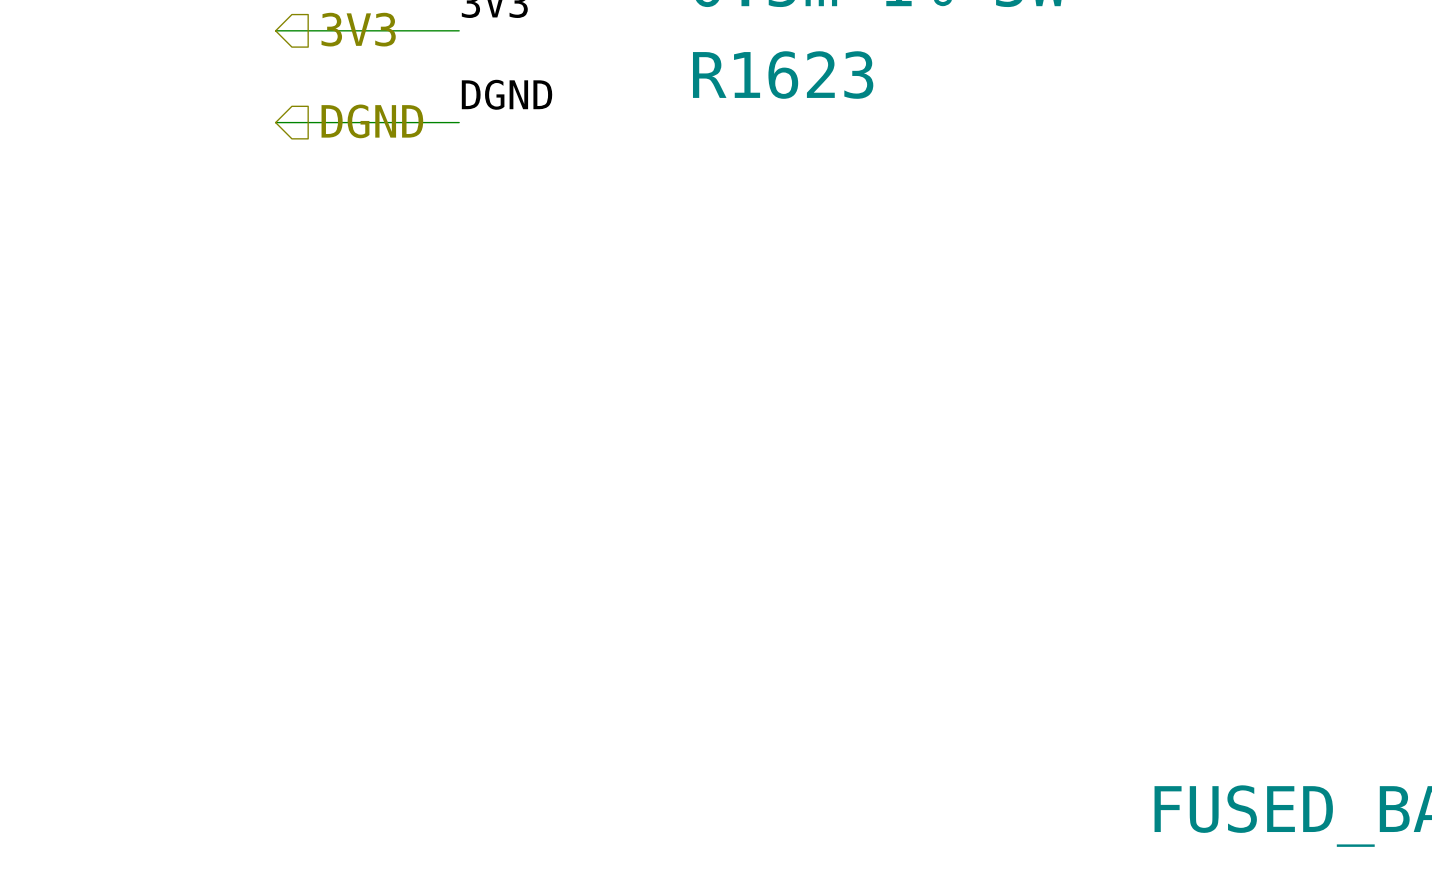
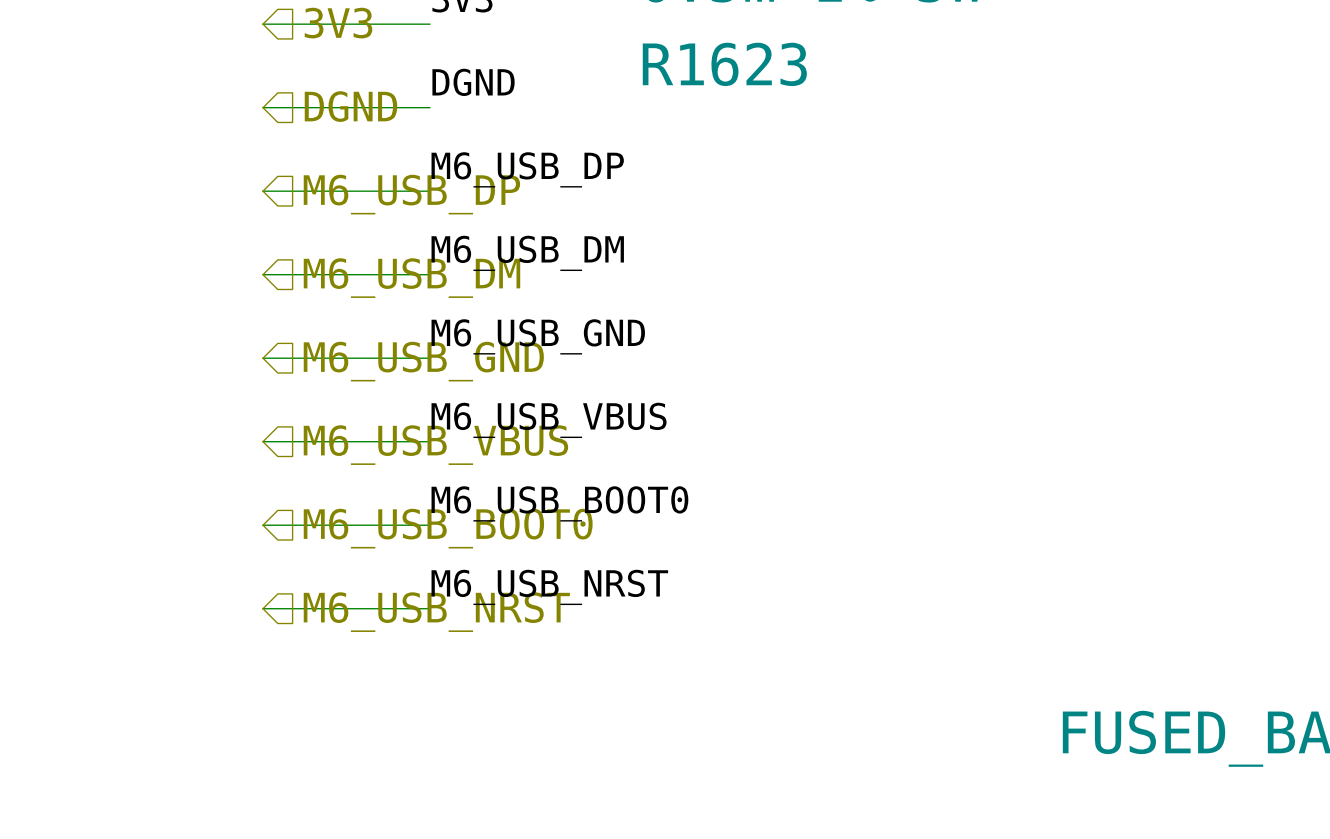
label: none -> M6_USB_DP (527, 169)
wire: none -> (263, 191) (430, 191)
hierarchical label: none -> M6_USB_DP (411, 194)
label: none -> M6_USB_DM (527, 253)
wire: none -> (263, 274) (430, 274)
hierarchical label: none -> M6_USB_DM (411, 278)
label: none -> M6_USB_GND (538, 336)
wire: none -> (263, 358) (430, 358)
hierarchical label: none -> M6_USB_GND (423, 361)
label: none -> M6_USB_VBUS (549, 420)
wire: none -> (263, 441) (430, 441)
hierarchical label: none -> M6_USB_VBUS (435, 445)
label: none -> M6_USB_BOOT0 (559, 503)
wire: none -> (263, 525) (430, 525)
hierarchical label: none -> M6_USB_BOOT0 (448, 528)
label: none -> M6_USB_NRST (549, 587)
wire: none -> (263, 608) (430, 608)
hierarchical label: none -> M6_USB_NRST (436, 612)

